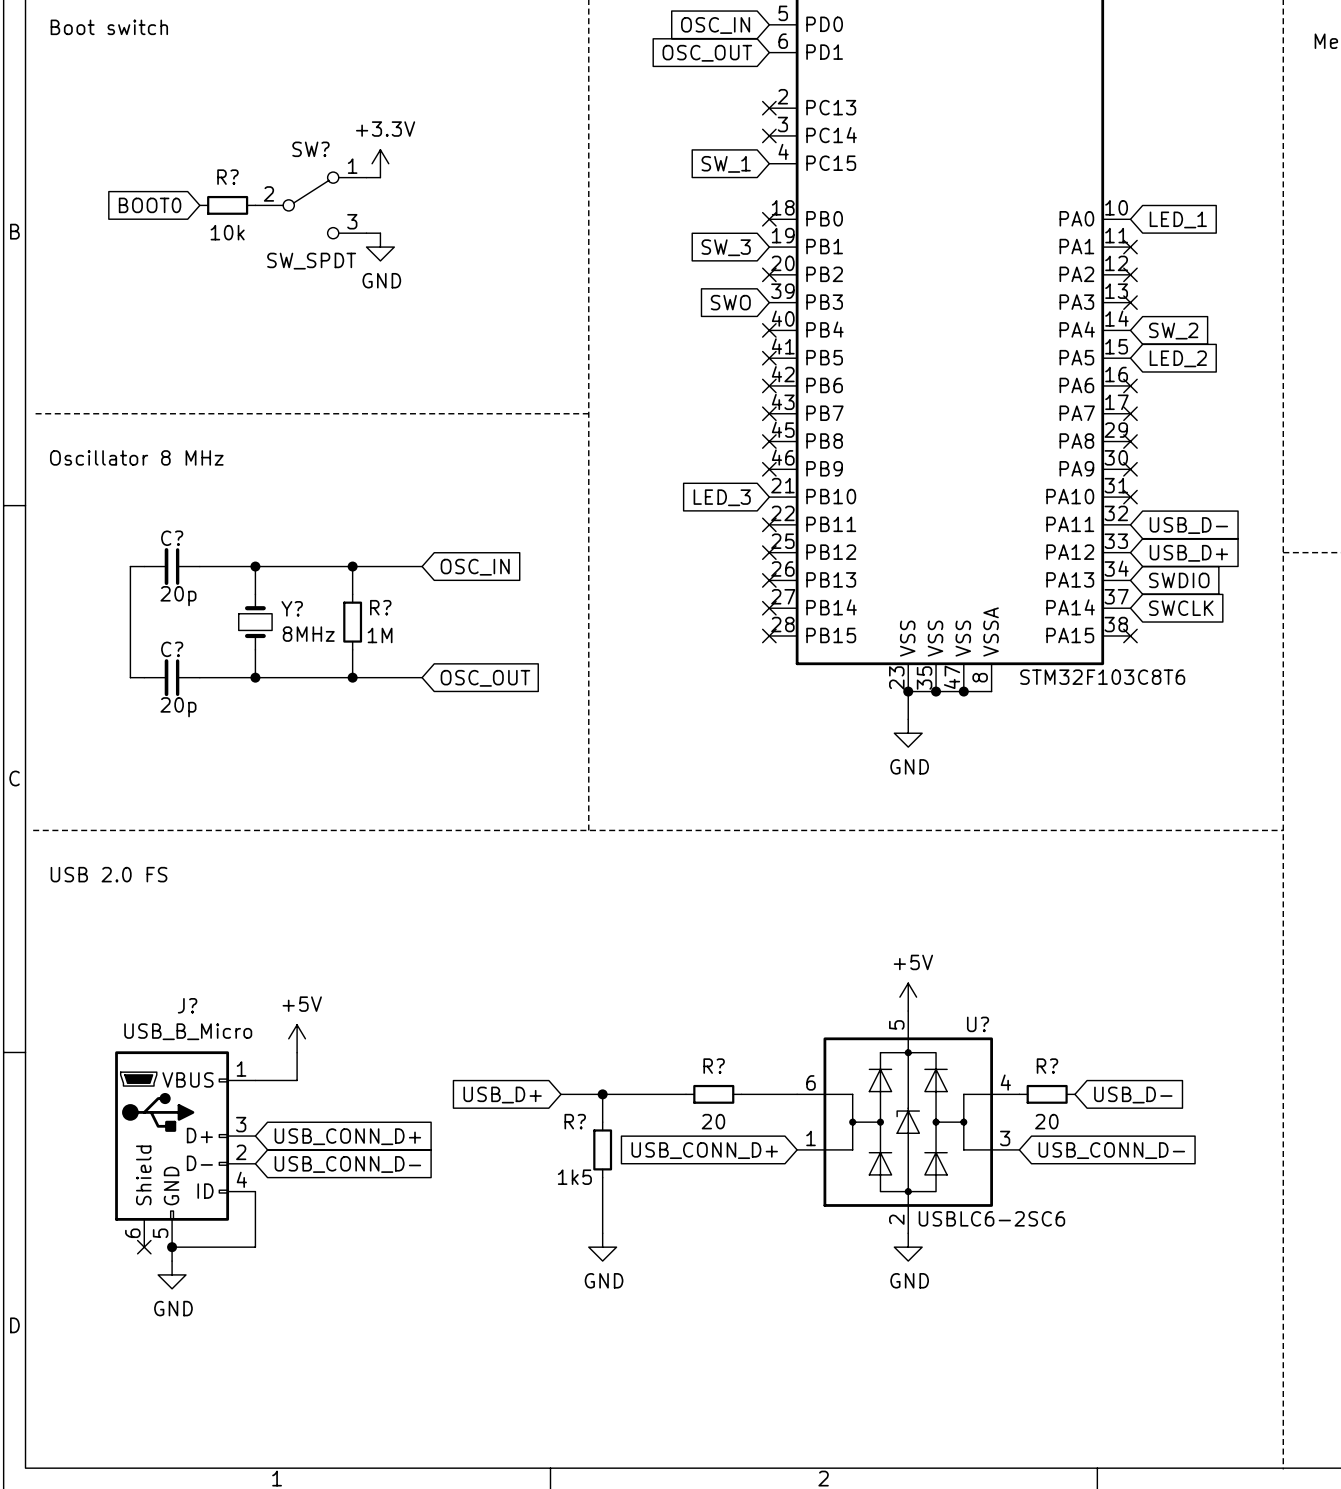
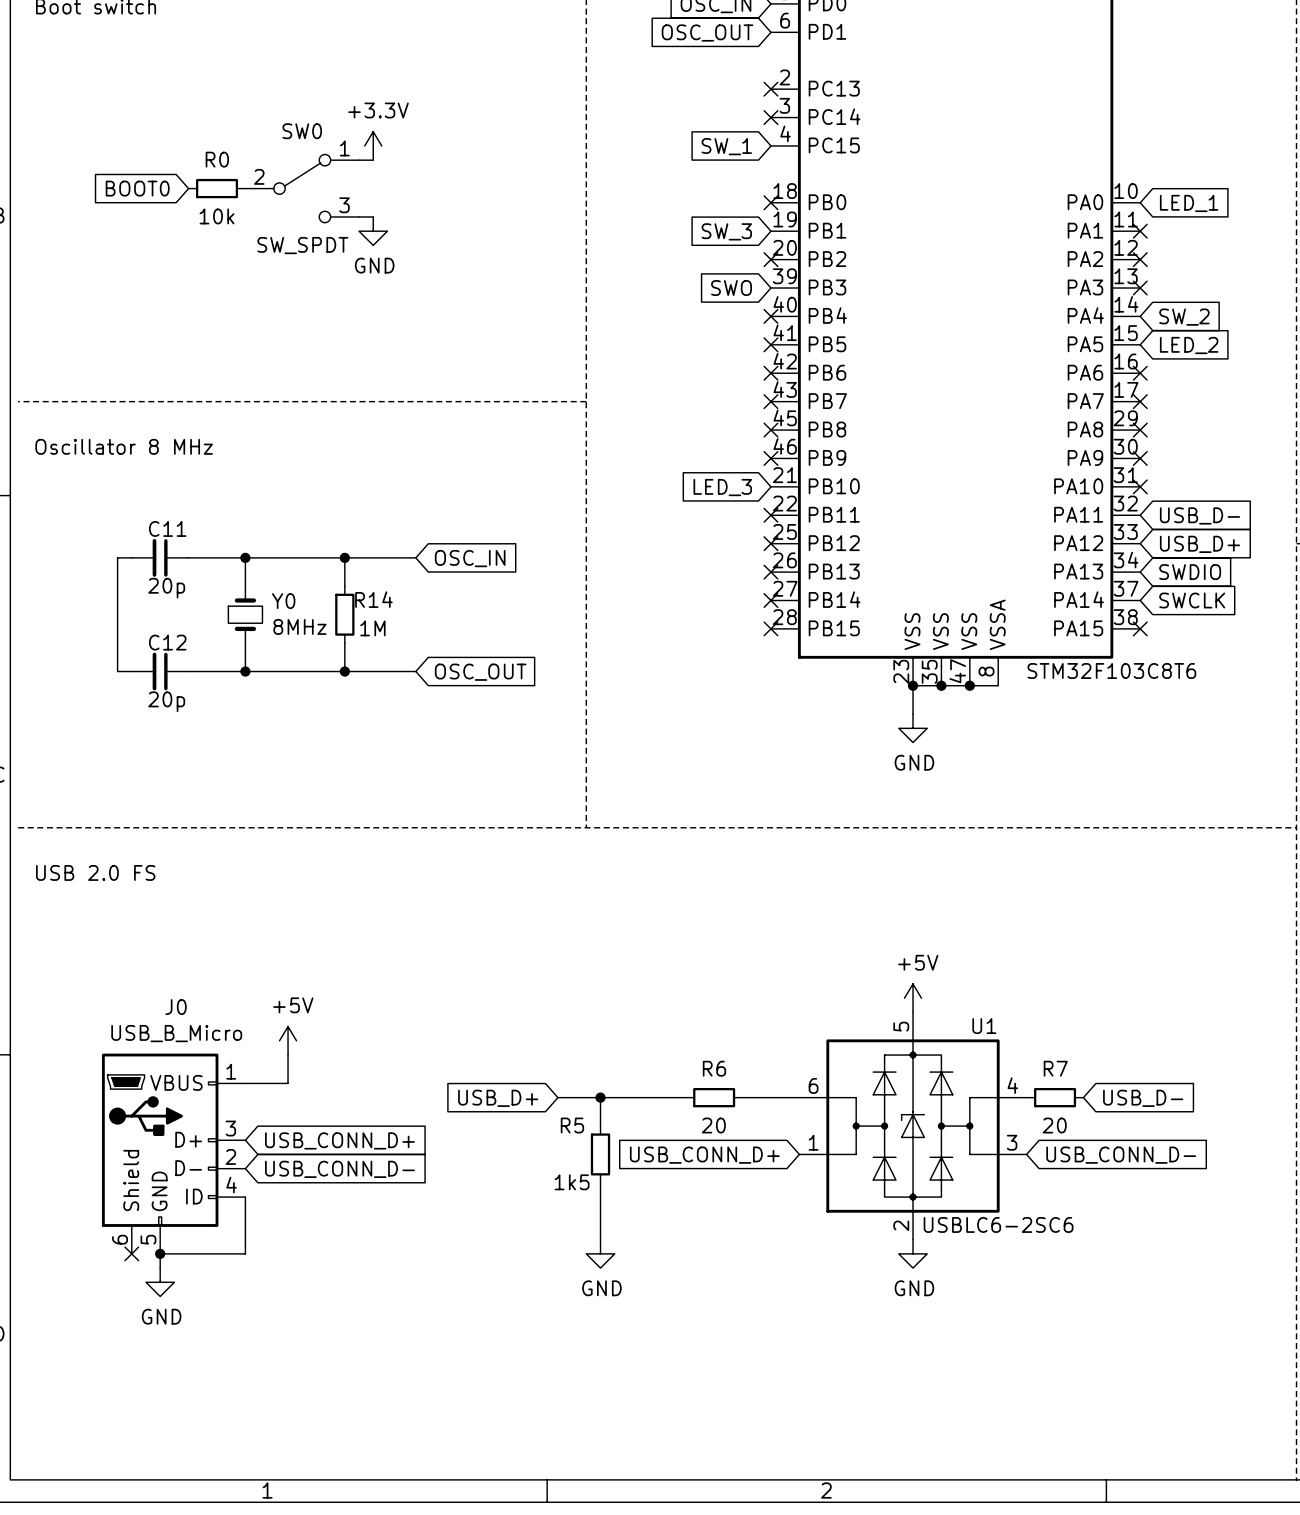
SW? name: SW? (310, 149) -> SW0 (302, 131)
R? name: R? (227, 177) -> R0 (217, 159)
C? name: C? (172, 538) -> C11 (167, 528)
R? name: R? (380, 607) -> R14 (373, 599)
Y? name: Y? (292, 608) -> Y0 (283, 601)
C? name: C? (172, 649) -> C12 (167, 642)
J? name: J? (187, 1005) -> J0 (176, 1007)
U? name: U? (978, 1024) -> U1 (984, 1026)
R? name: R? (714, 1066) -> R6 (714, 1068)
R? name: R? (1047, 1066) -> R7 (1055, 1068)
R? name: R? (575, 1121) -> R5 (572, 1125)

